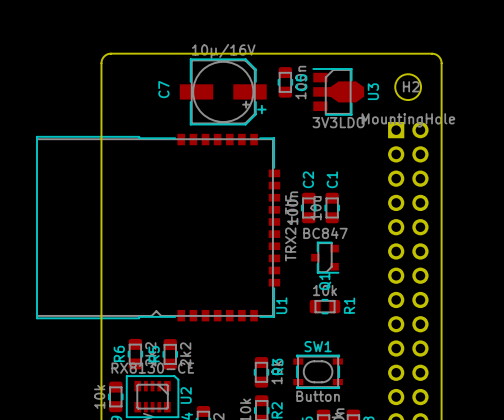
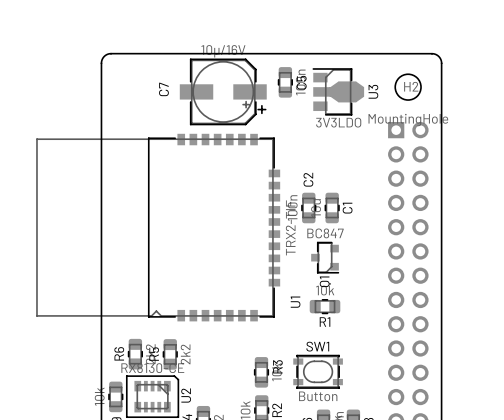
U1 footprint: [36, 133, 281, 322] -> [36, 133, 281, 322]
C1 name position: C1 (332, 179) -> C1 (347, 208)
R1 name rotation: 0° (349, 305) -> 90° clockwise (325, 322)
R1 name position: R1 (349, 305) -> R1 (325, 322)

